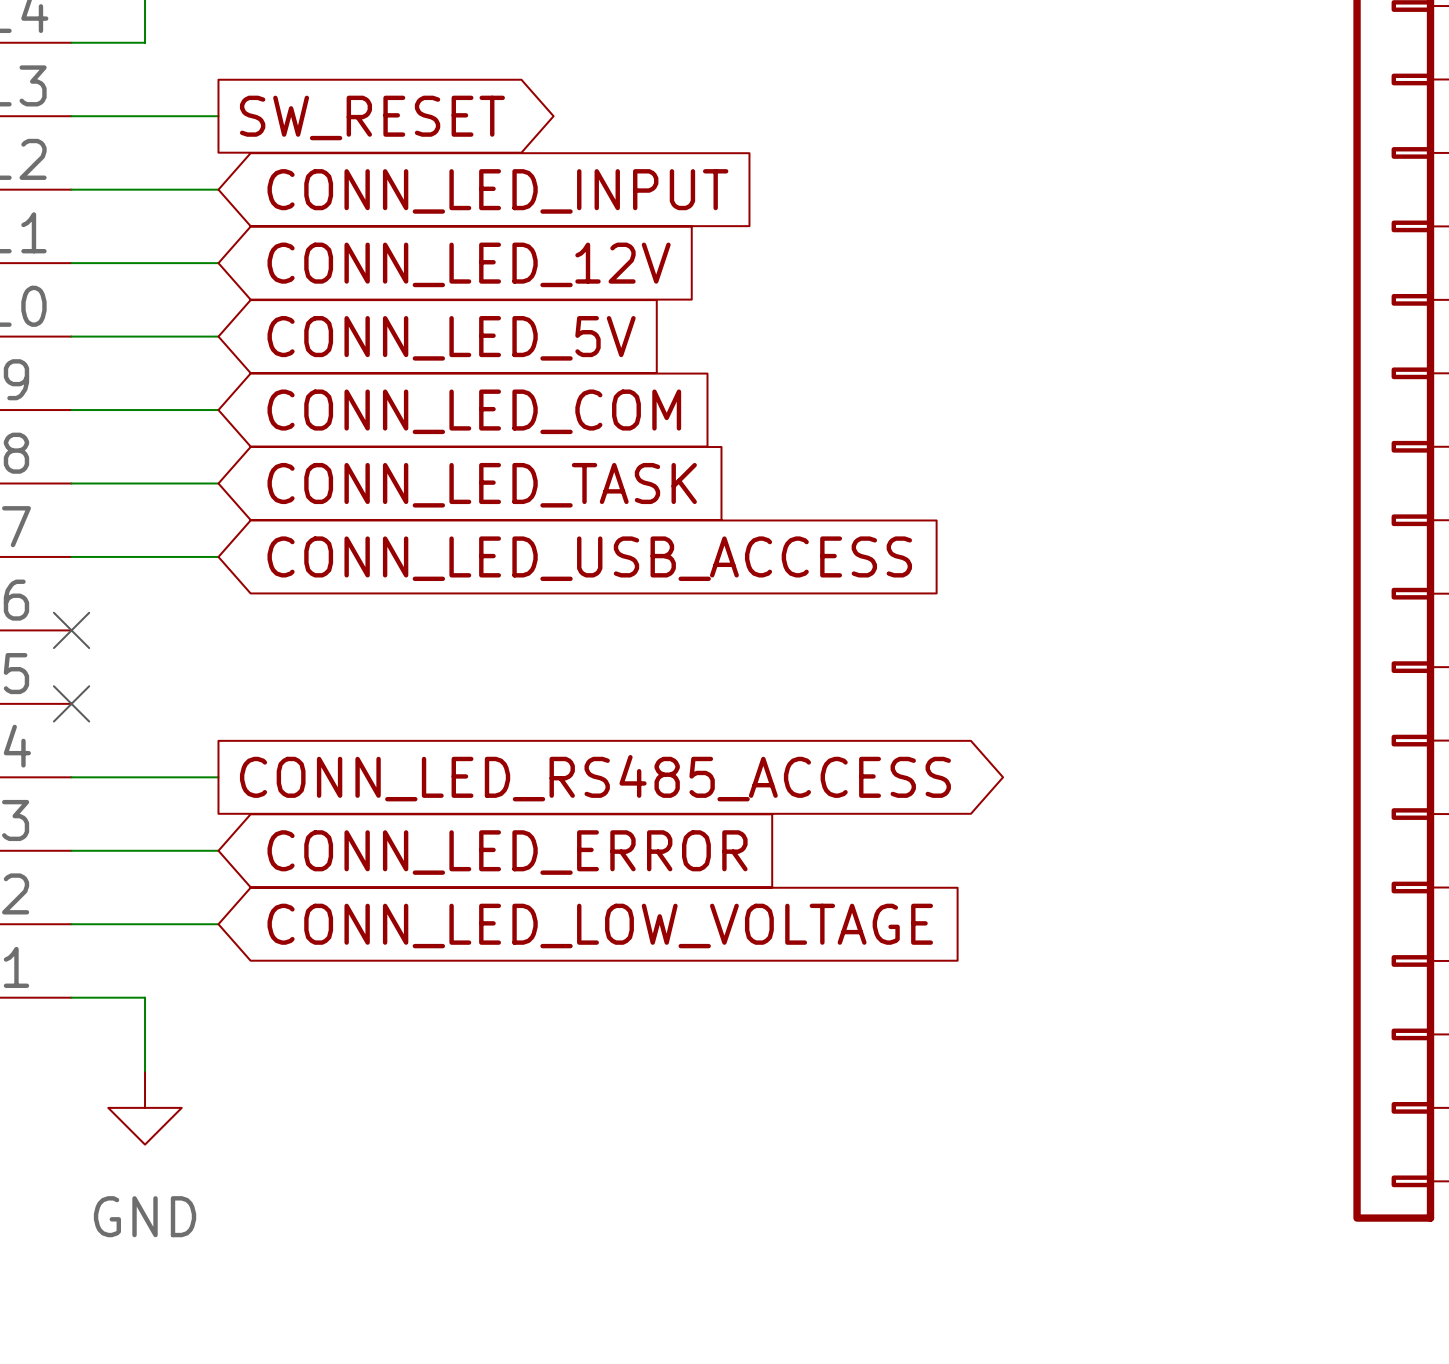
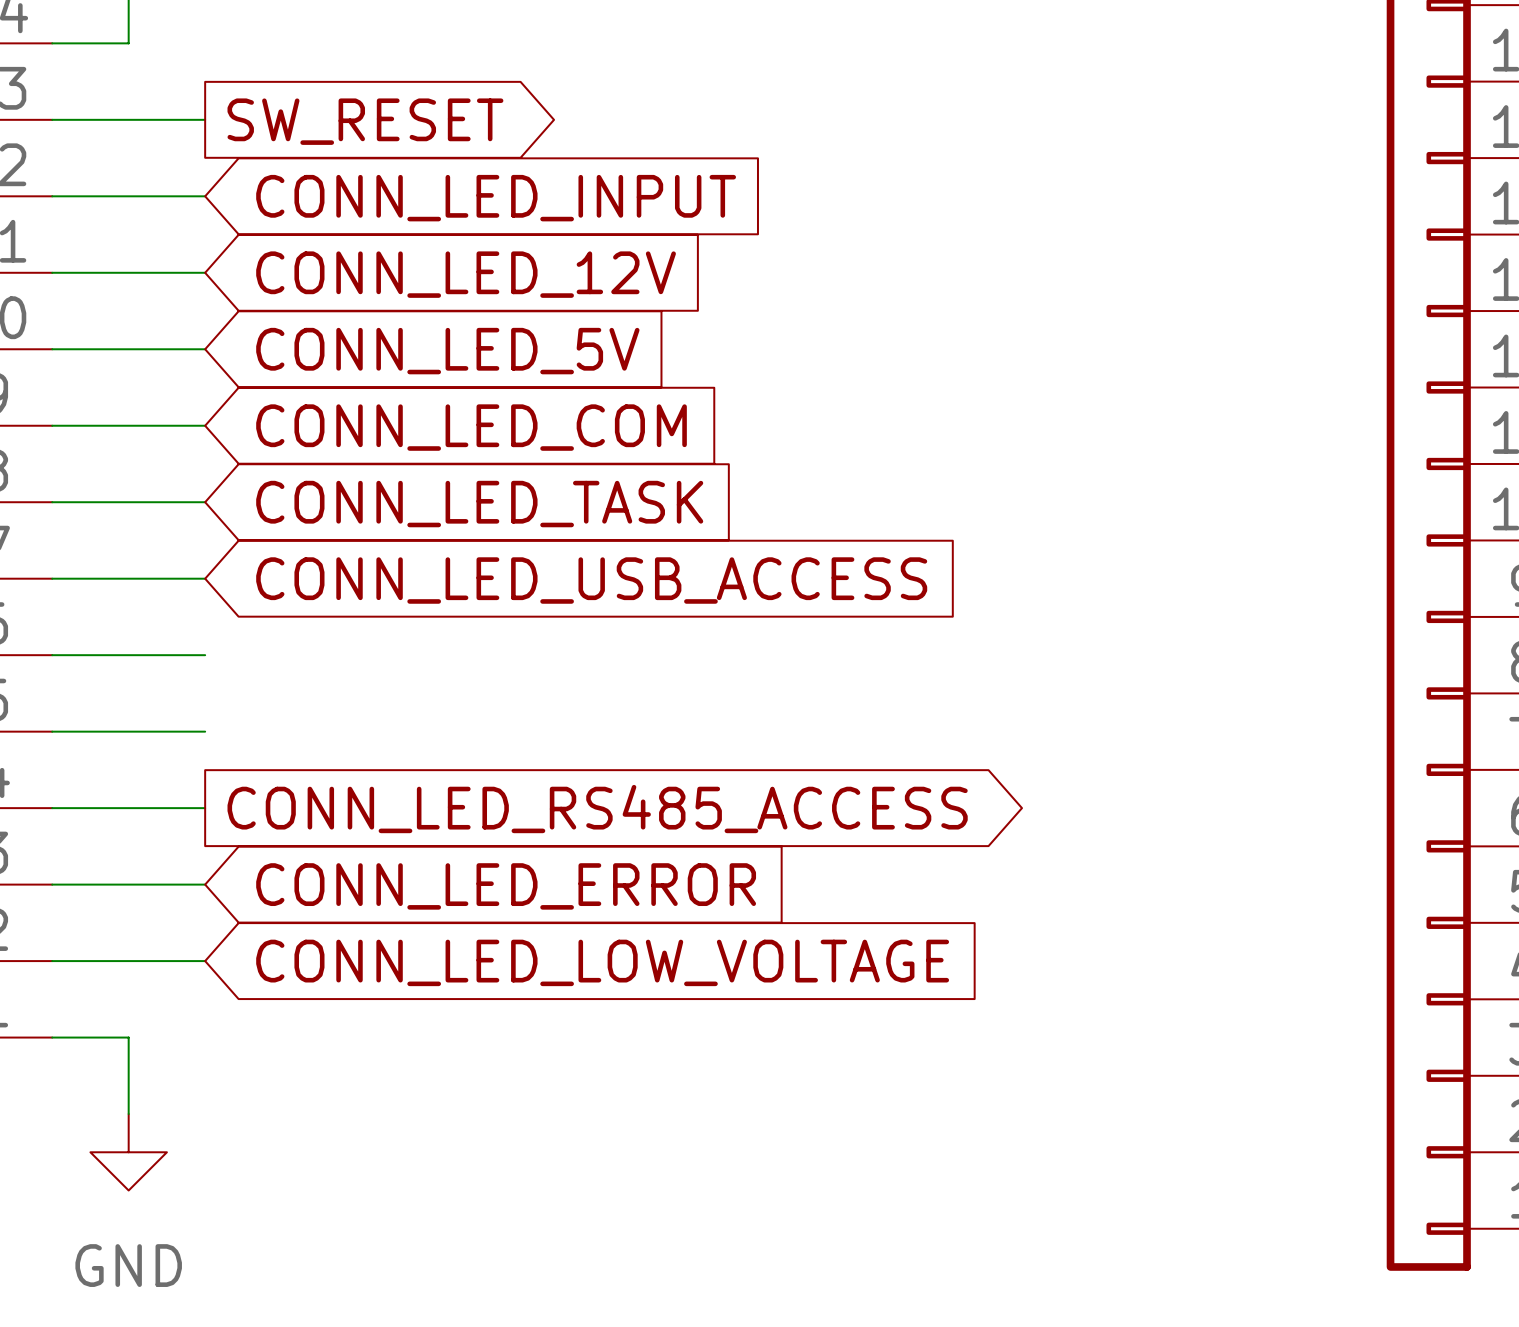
wire: none -> (52, 655) (205, 655)
no-connect mark: (71, 630) -> none
wire: none -> (52, 731) (205, 731)
no-connect mark: (71, 703) -> none

